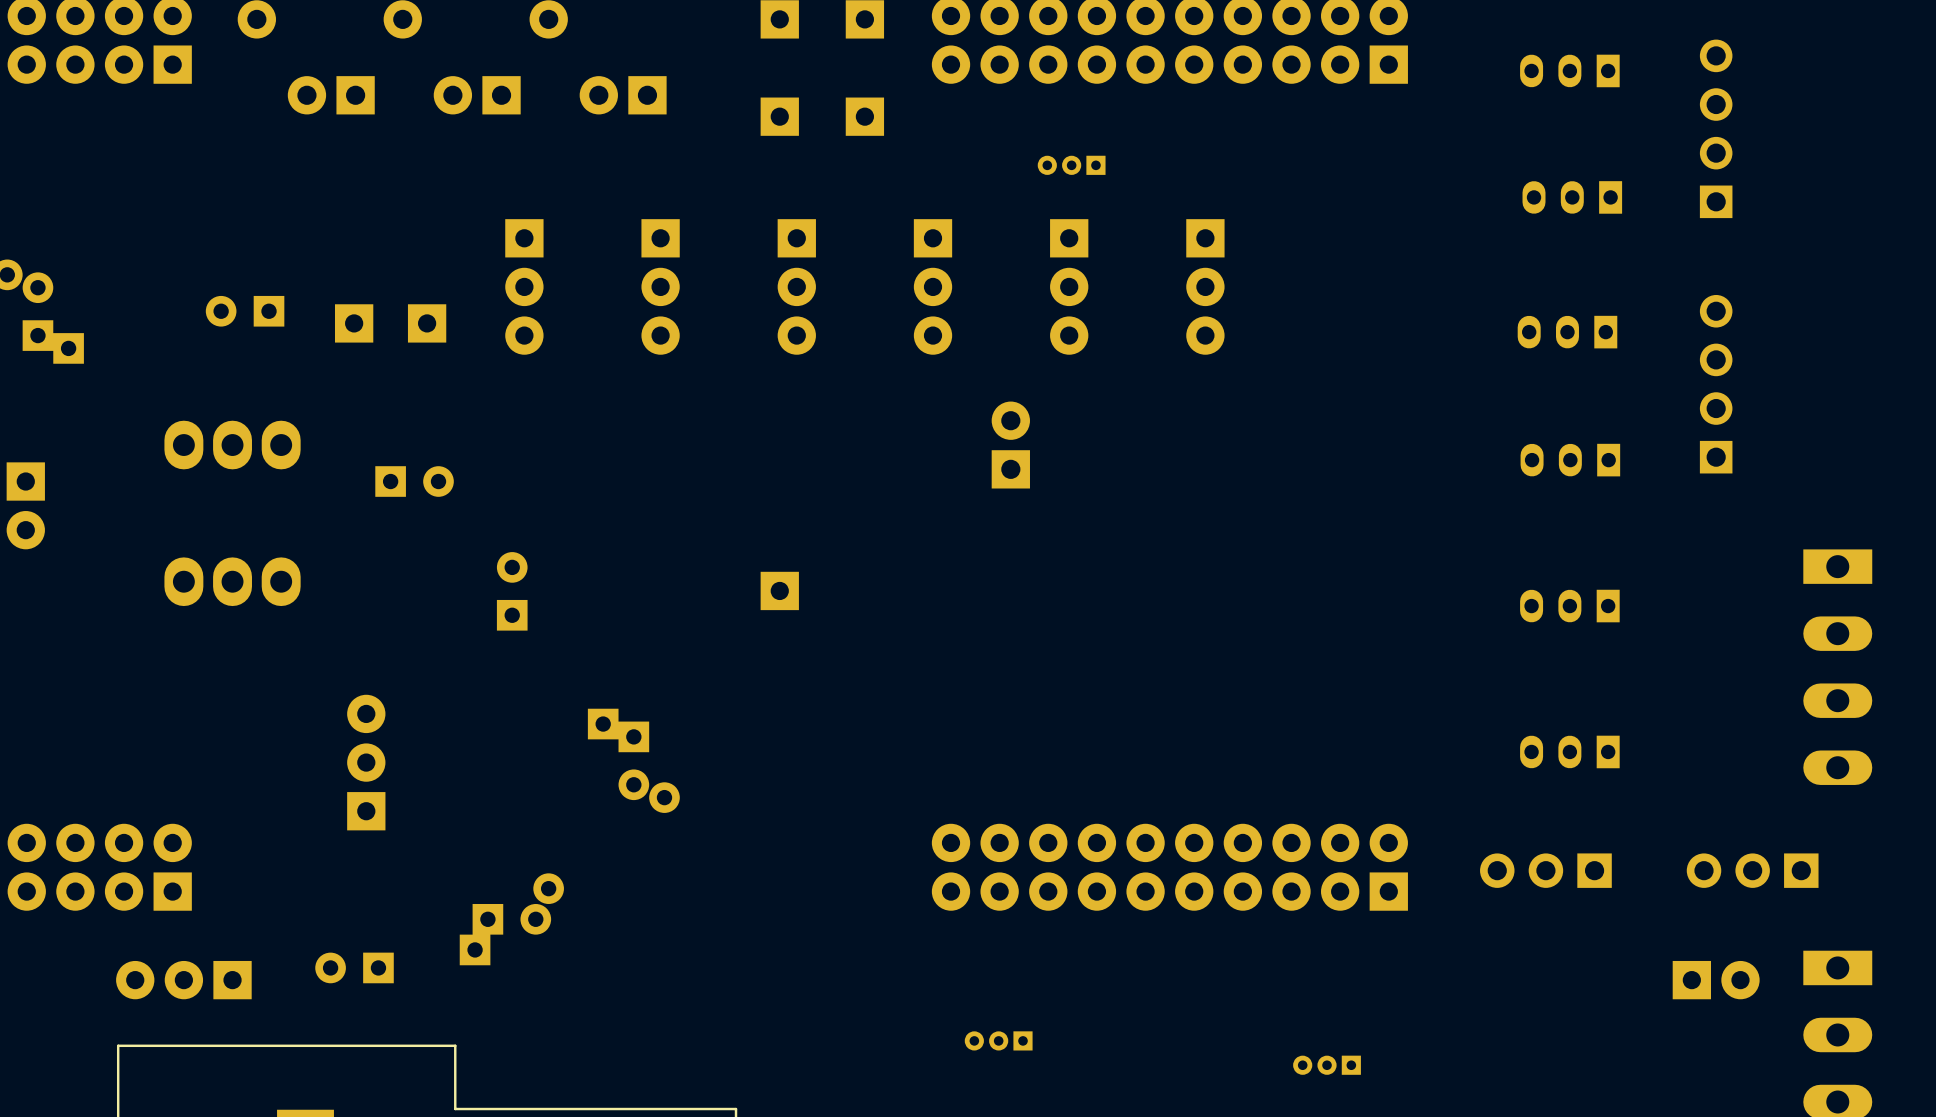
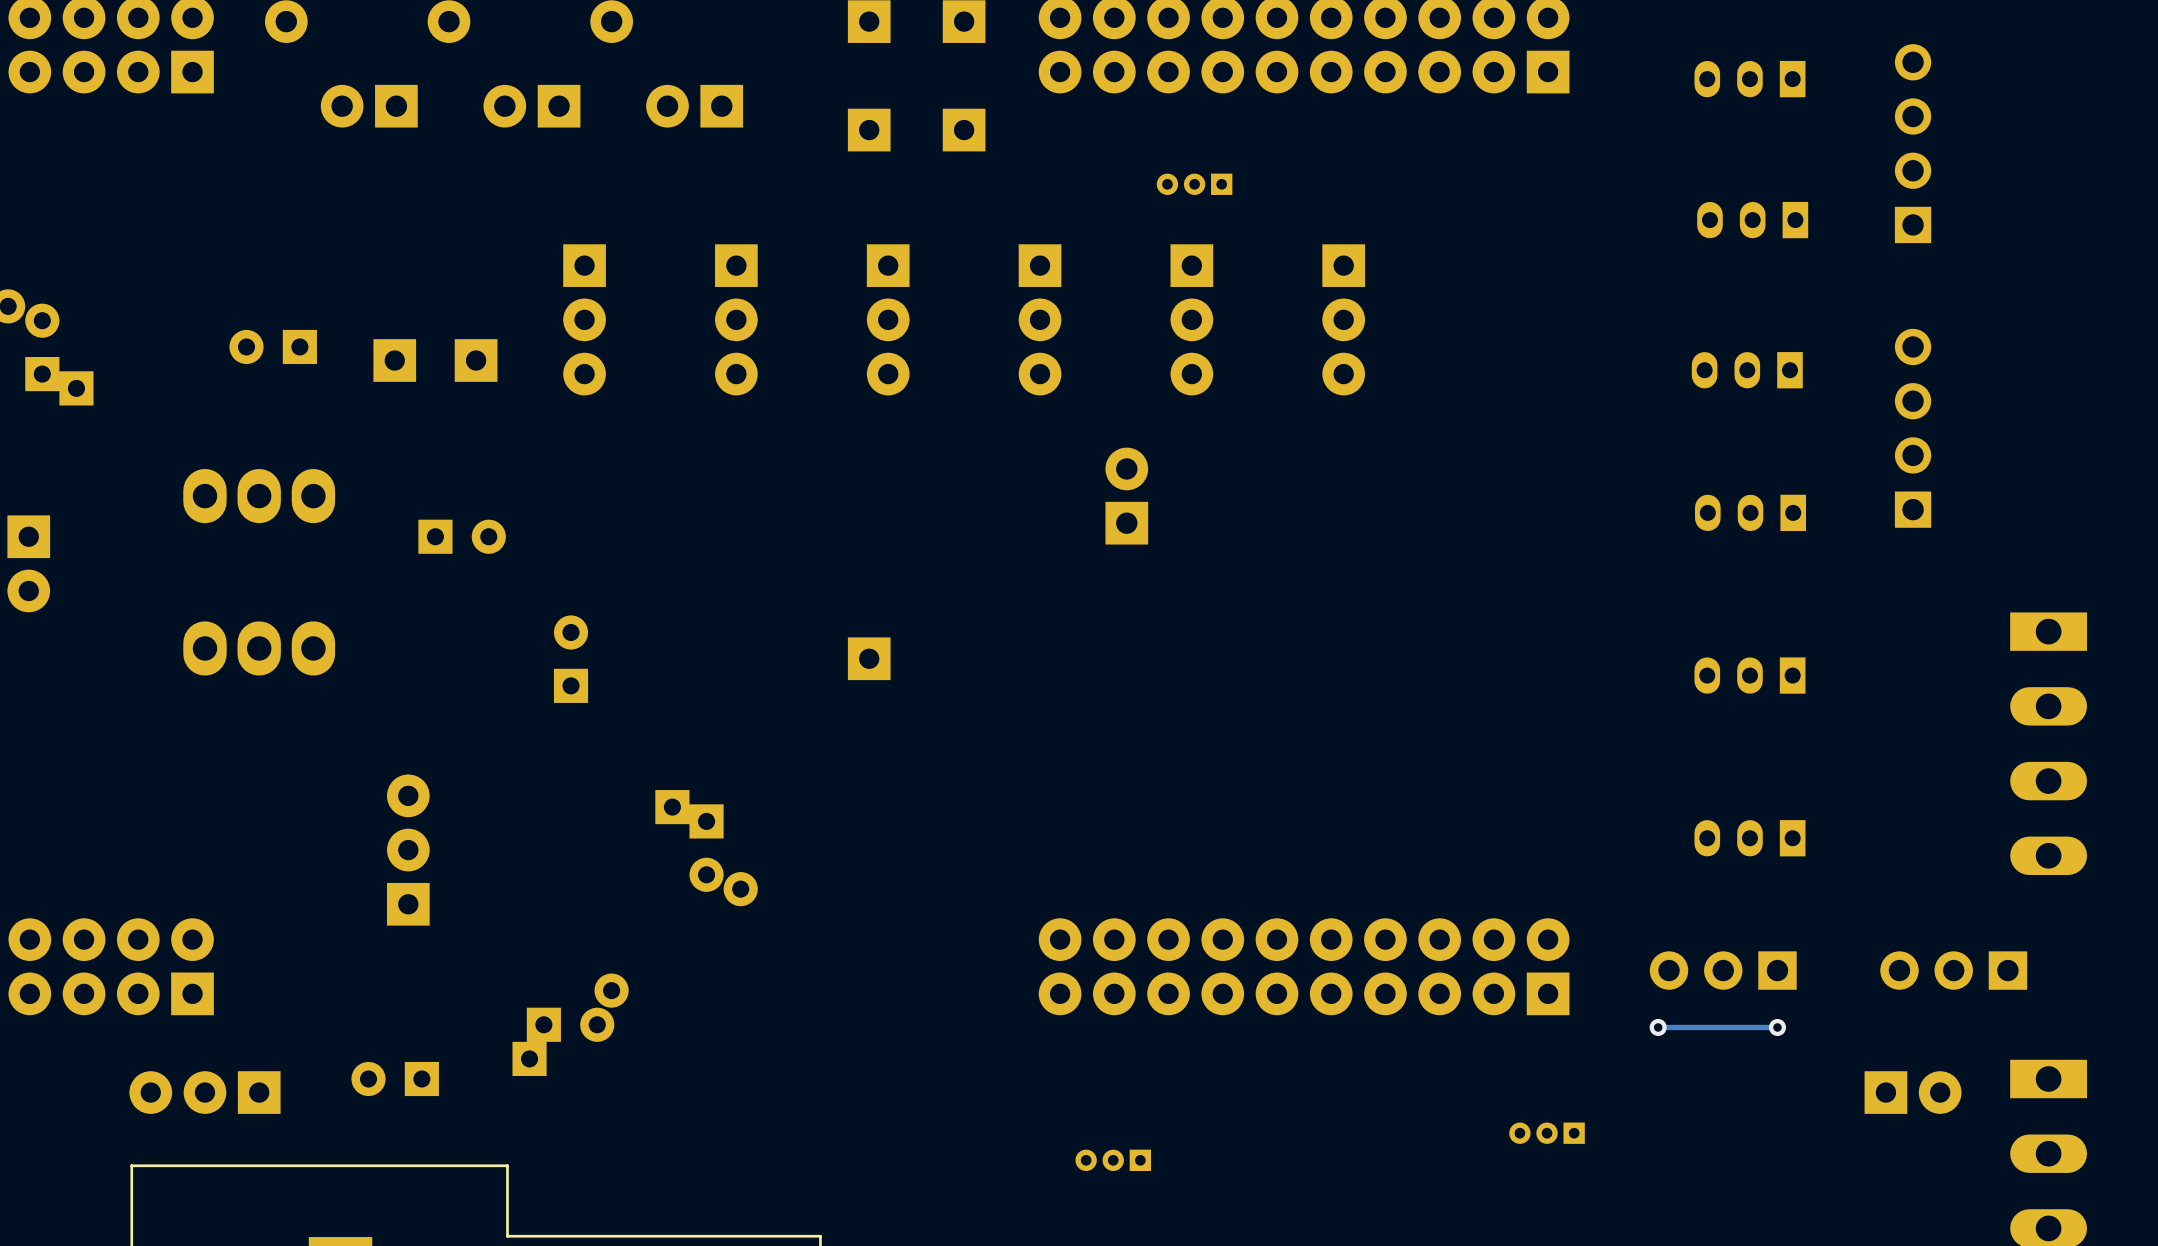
via: none -> (1658, 1027)
track: none -> (1777, 1027) (1655, 1027)
via: none -> (1777, 1027)
part position: (1327, 1065) -> (1547, 1133)

